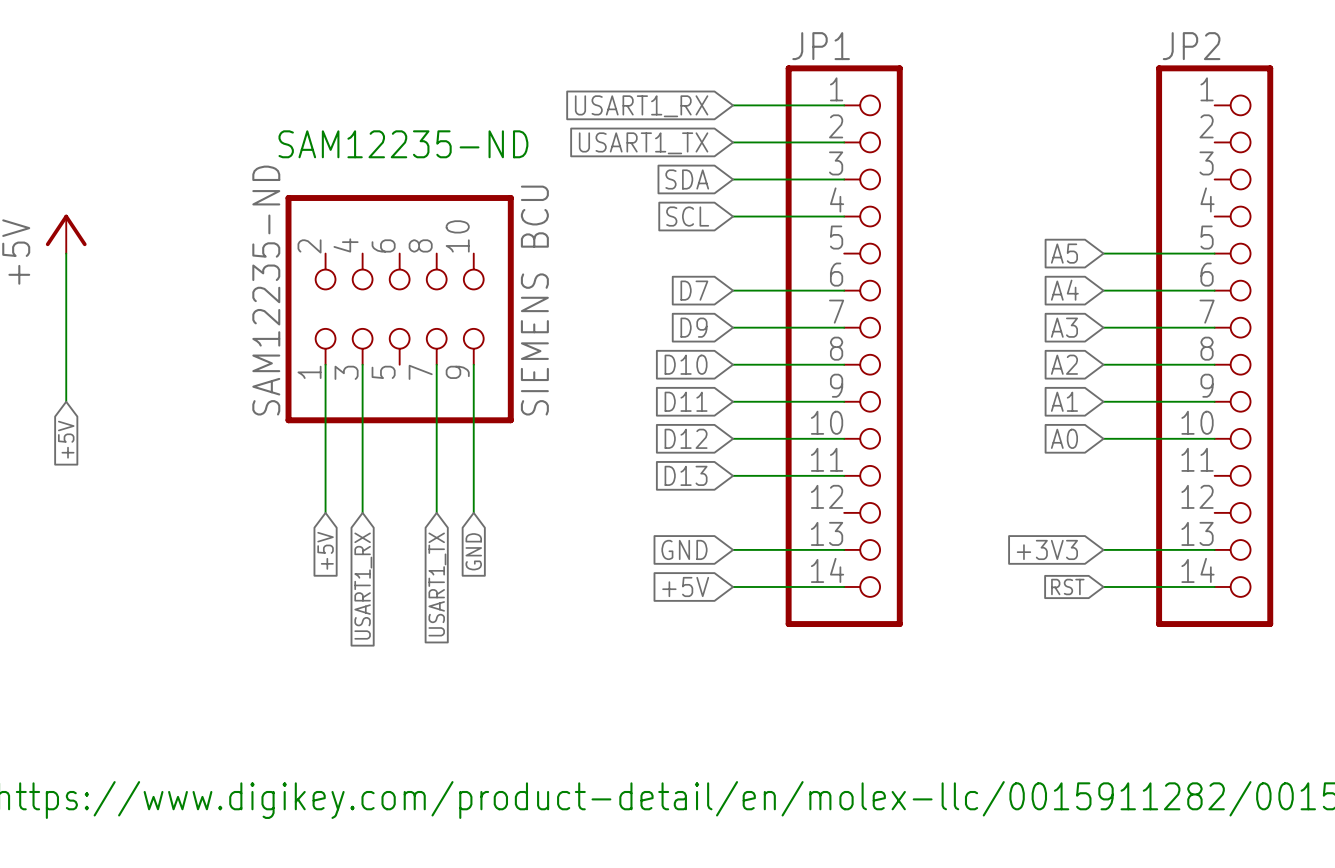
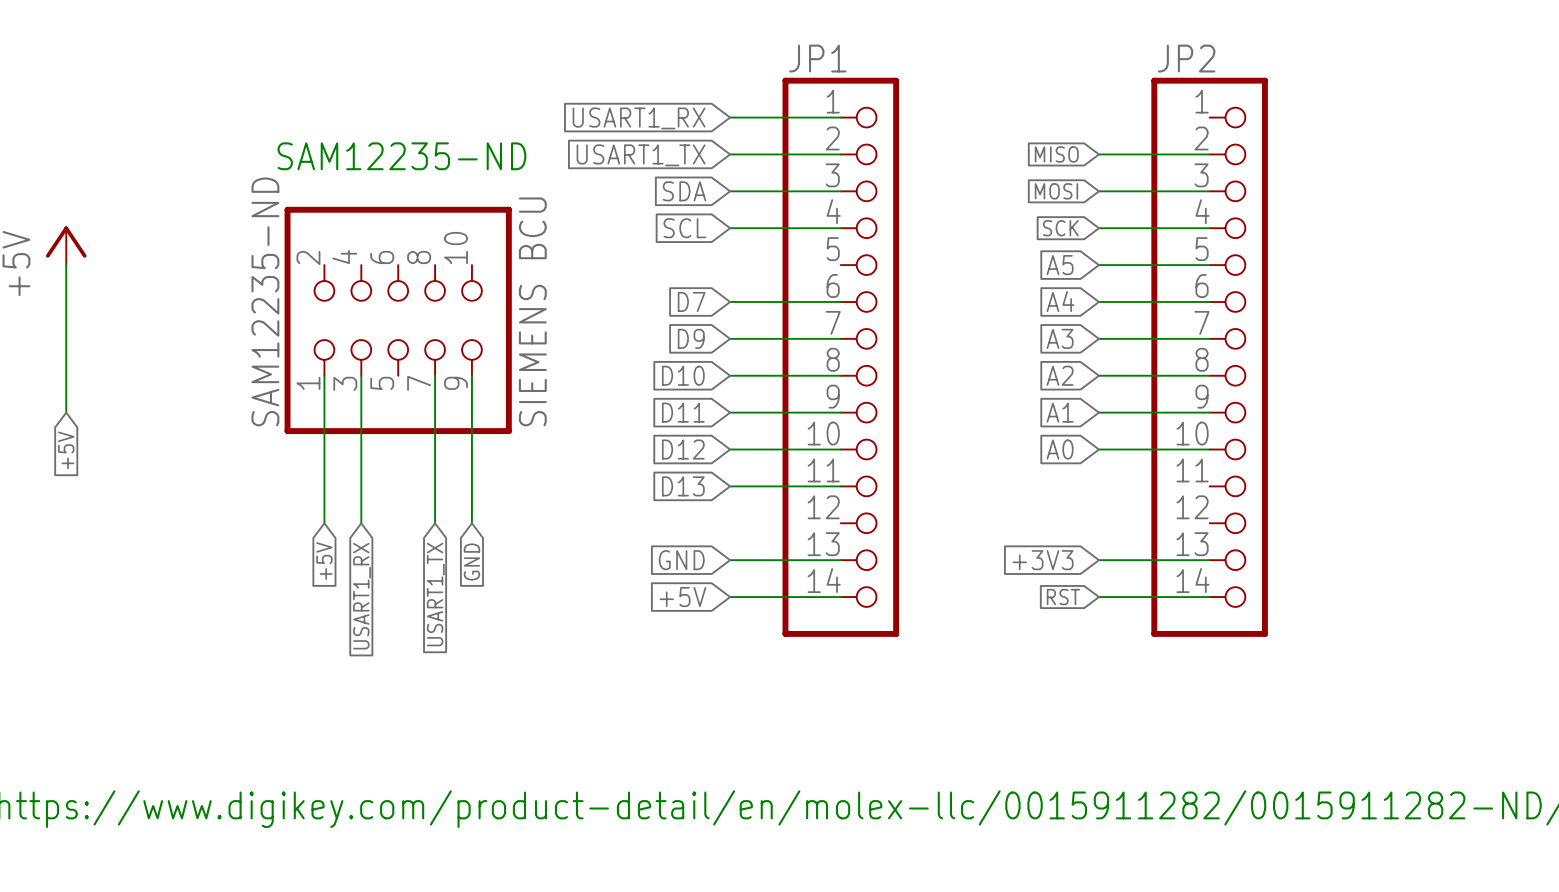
global label: none -> MISO (1056, 154)
wire: none -> (1098, 154) (1209, 154)
global label: none -> MOSI (1056, 191)
wire: none -> (1098, 191) (1209, 191)
global label: none -> SCK (1060, 228)
wire: none -> (1098, 228) (1209, 228)

